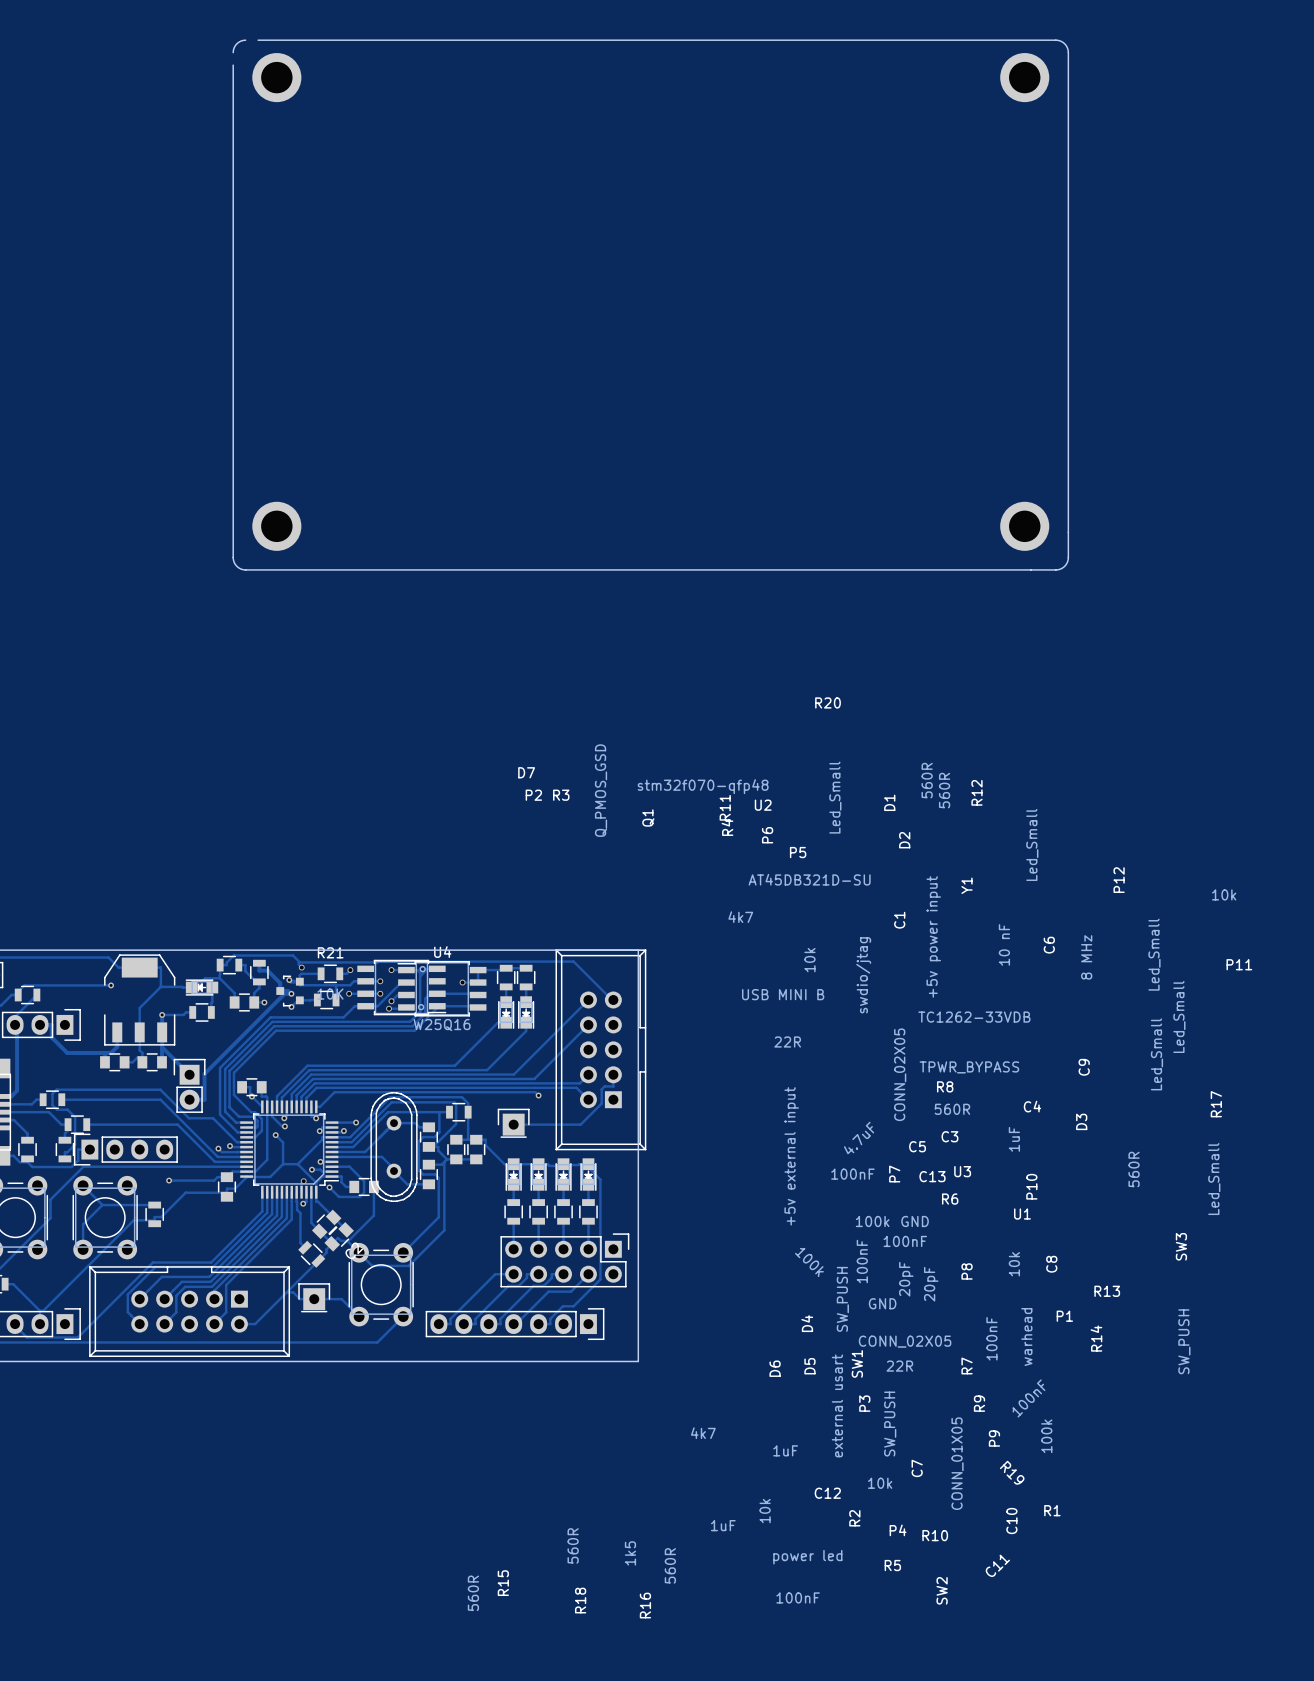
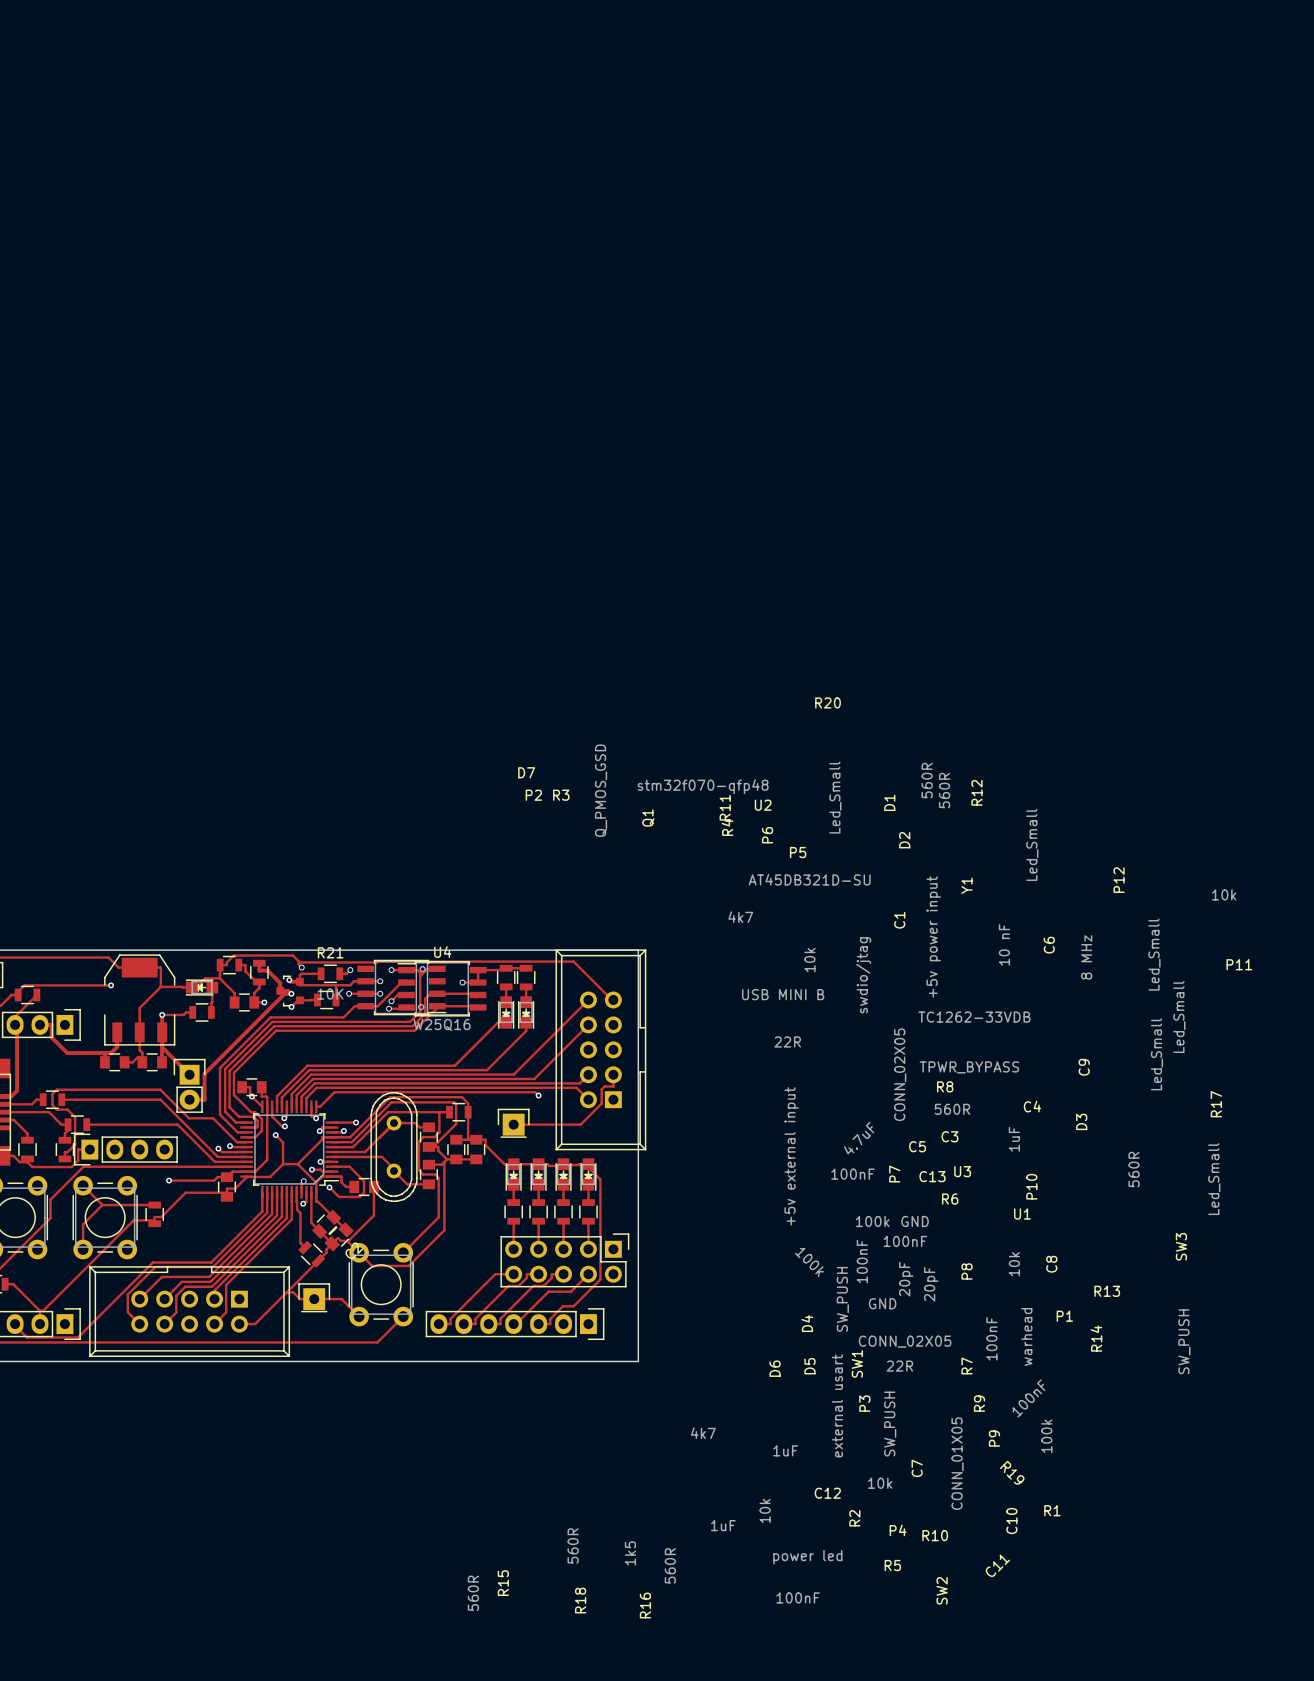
board edge: (245, 40) (236, 43) (233, 52) -> none
board edge: (258, 40) (1055, 40) (1062, 41) (1066, 46) (1068, 52) (1068, 557) (1066, 563) (1062, 568) (1055, 569) (245, 569) (239, 568) (234, 563) (233, 557) (233, 65) -> none
part: (276, 77) -> none
part: (1024, 77) -> none
part: (276, 526) -> none
part: (1024, 526) -> none

